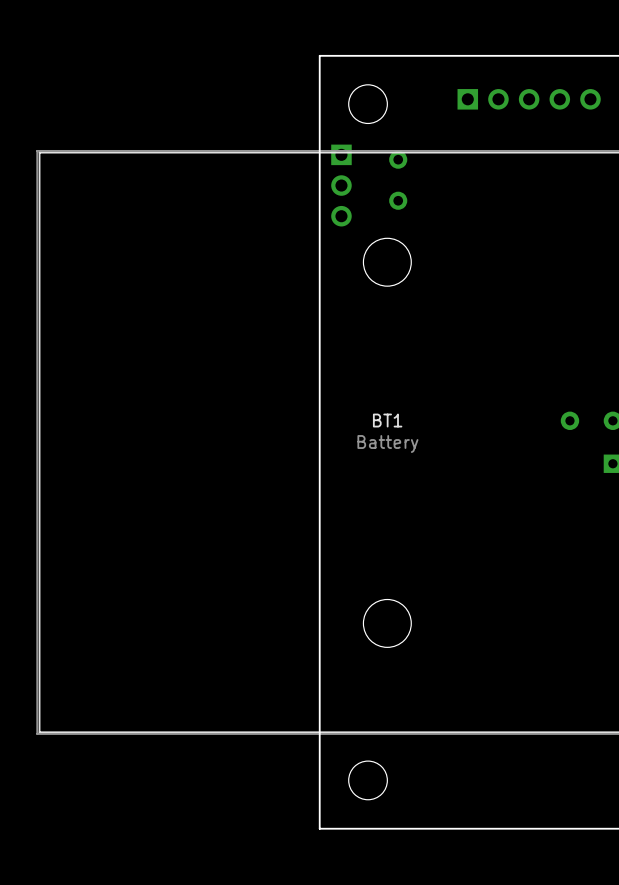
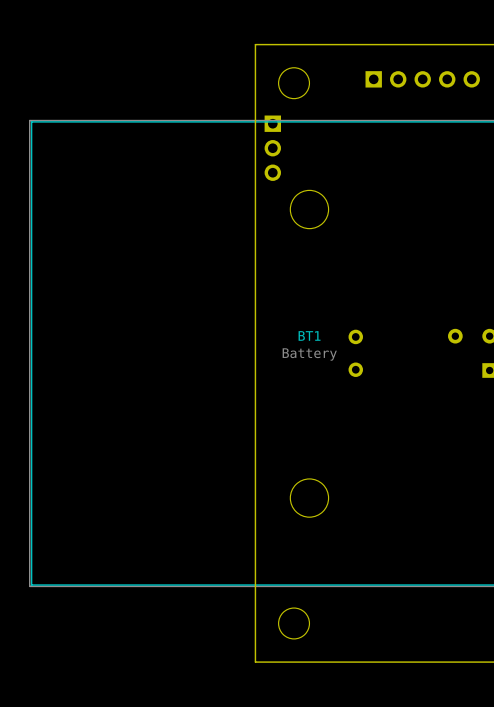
part position: (398, 180) -> (355, 353)

